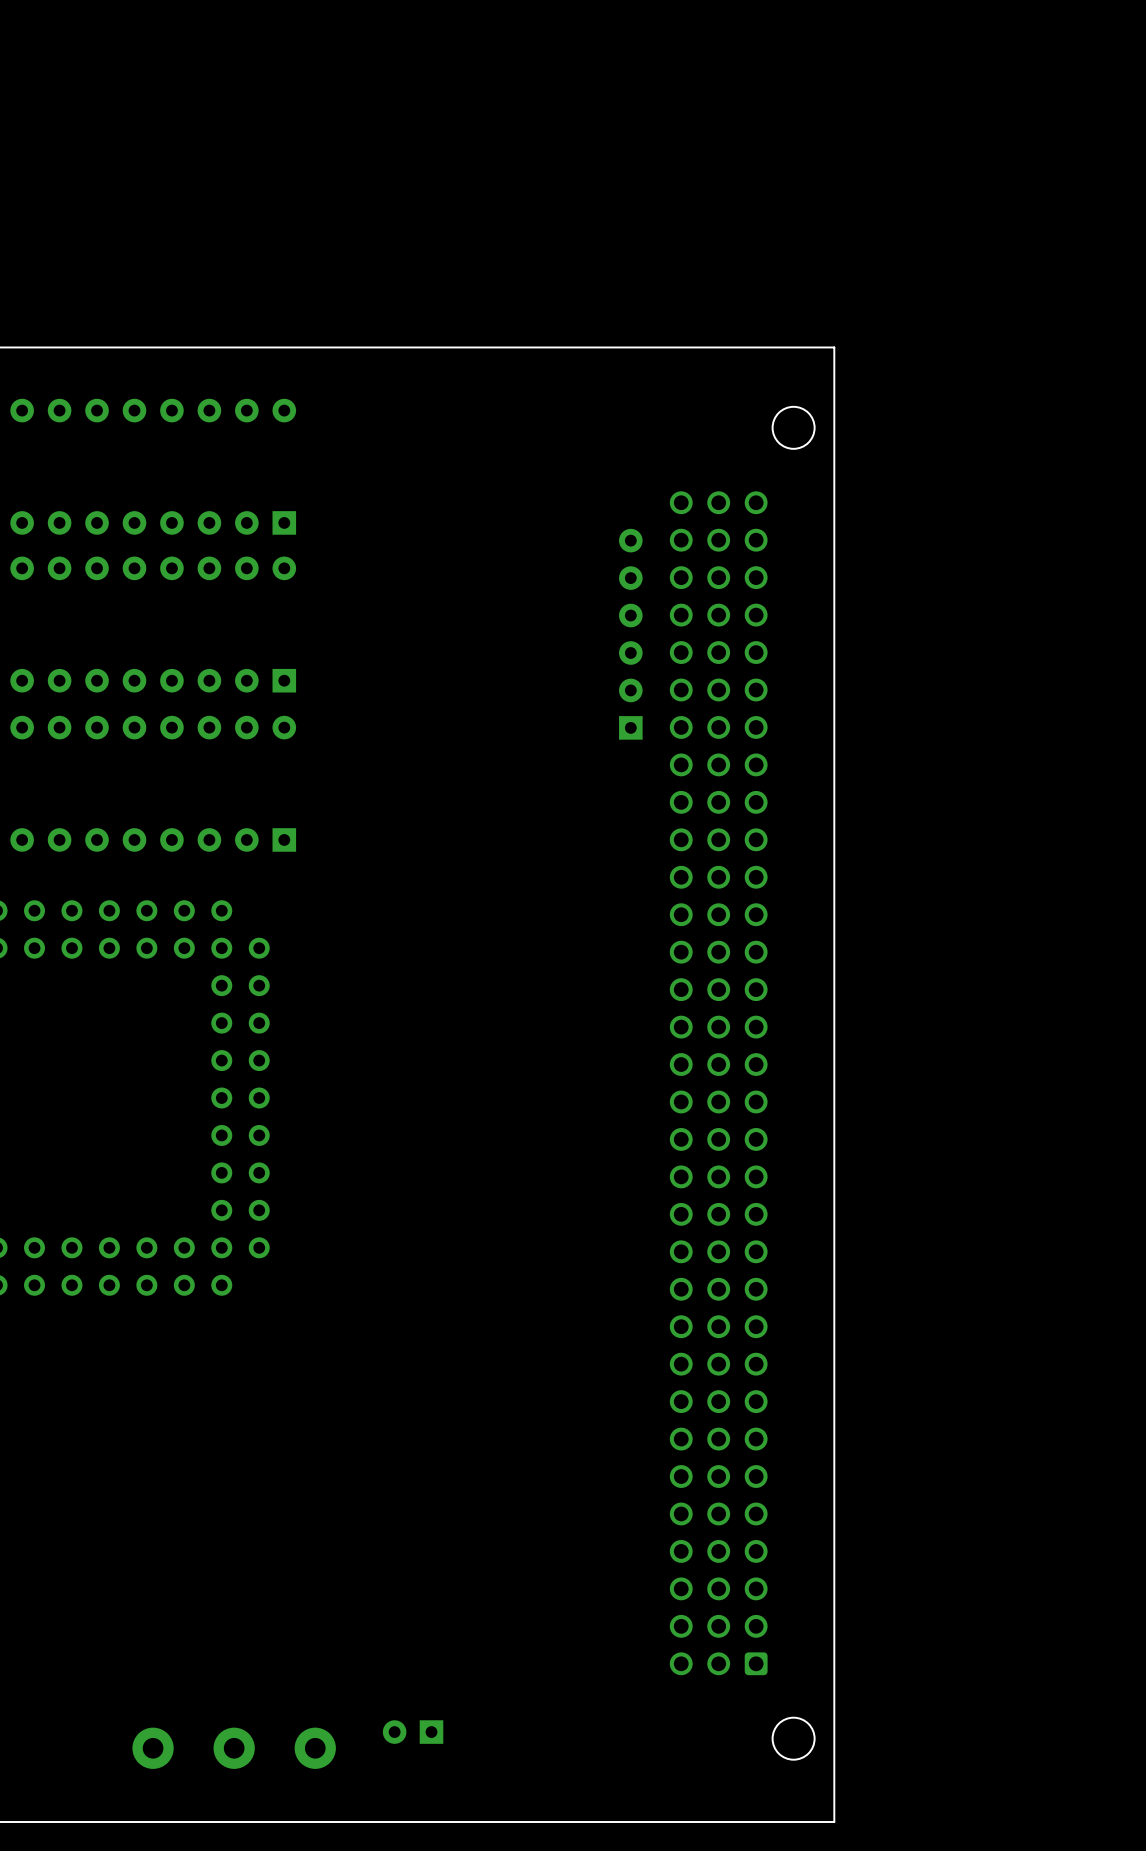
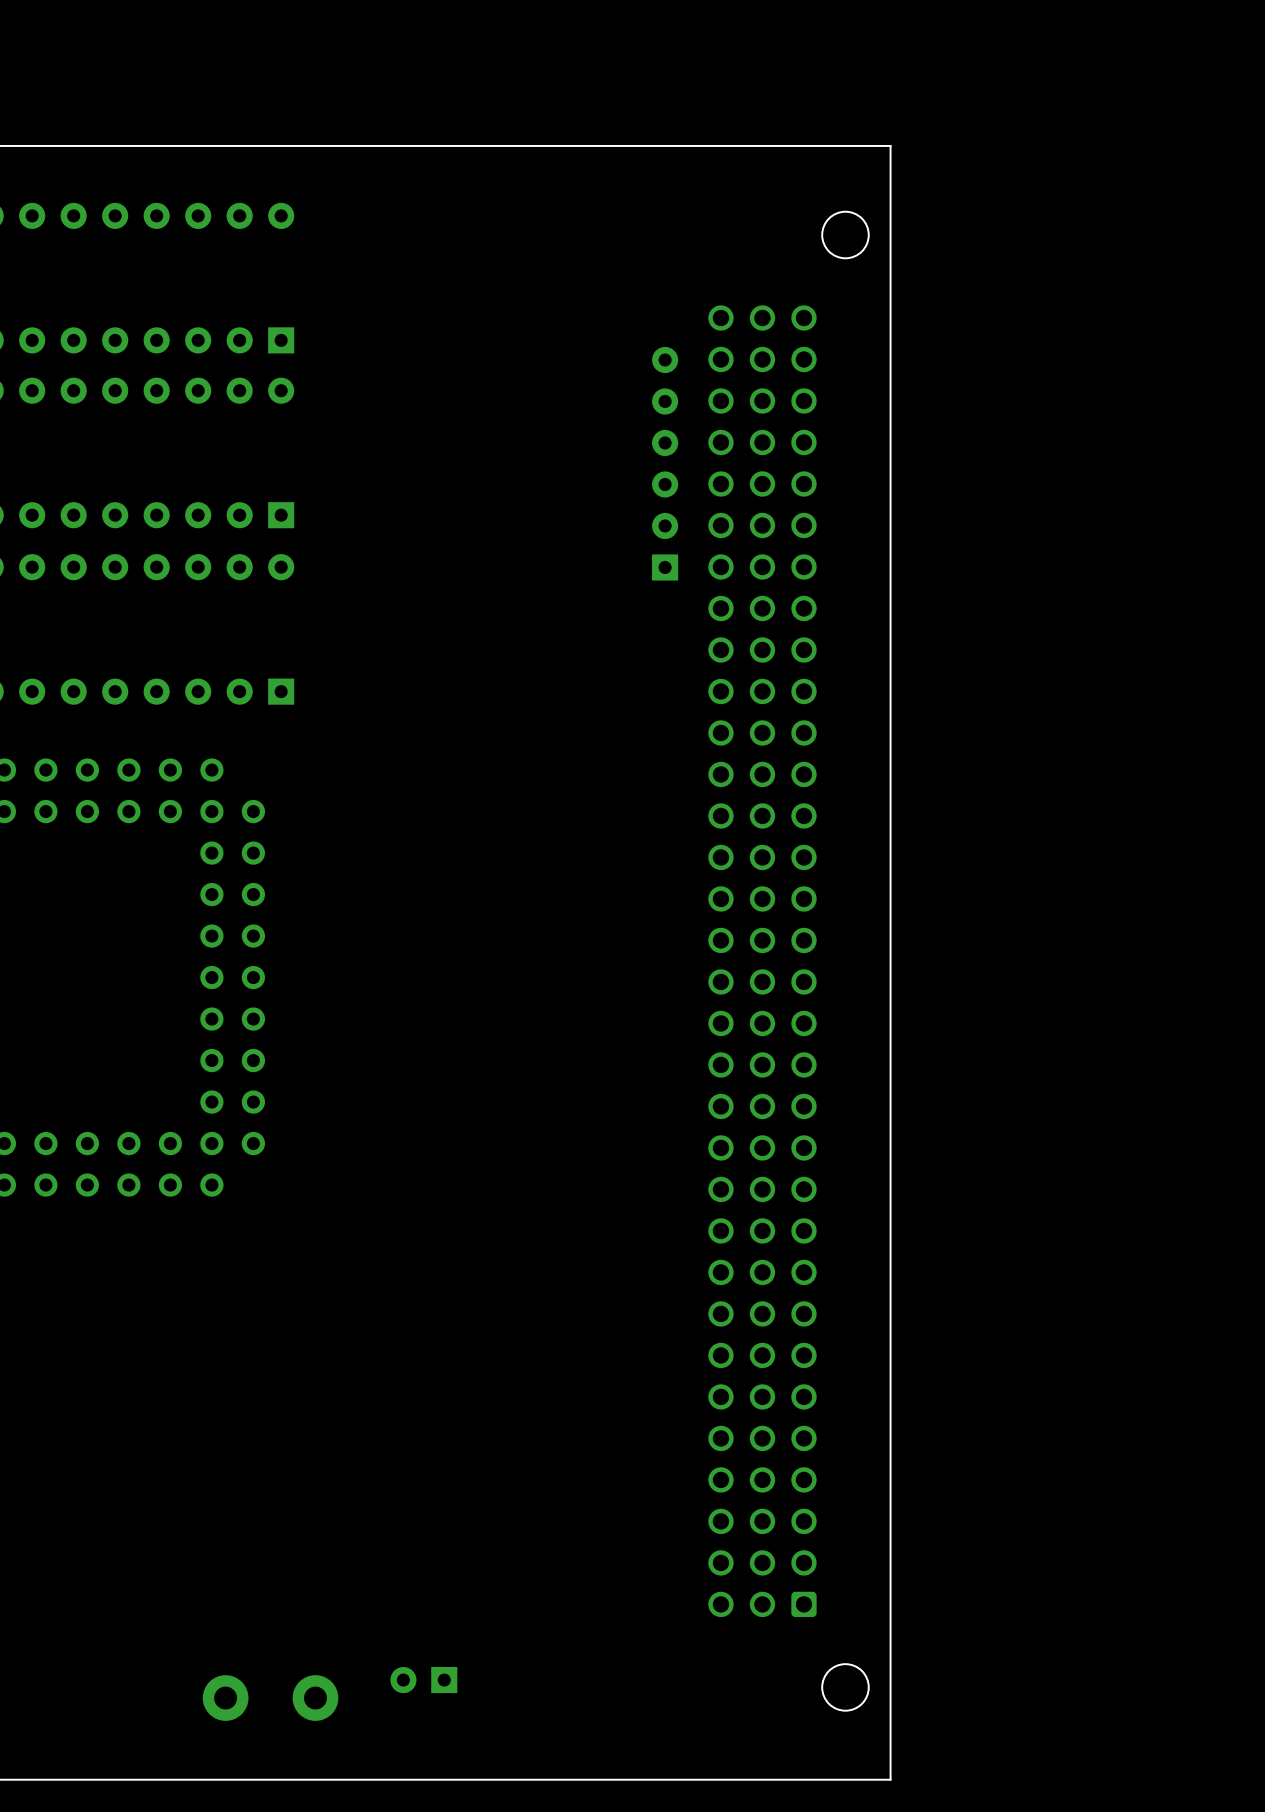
part: (153, 1748) -> none

